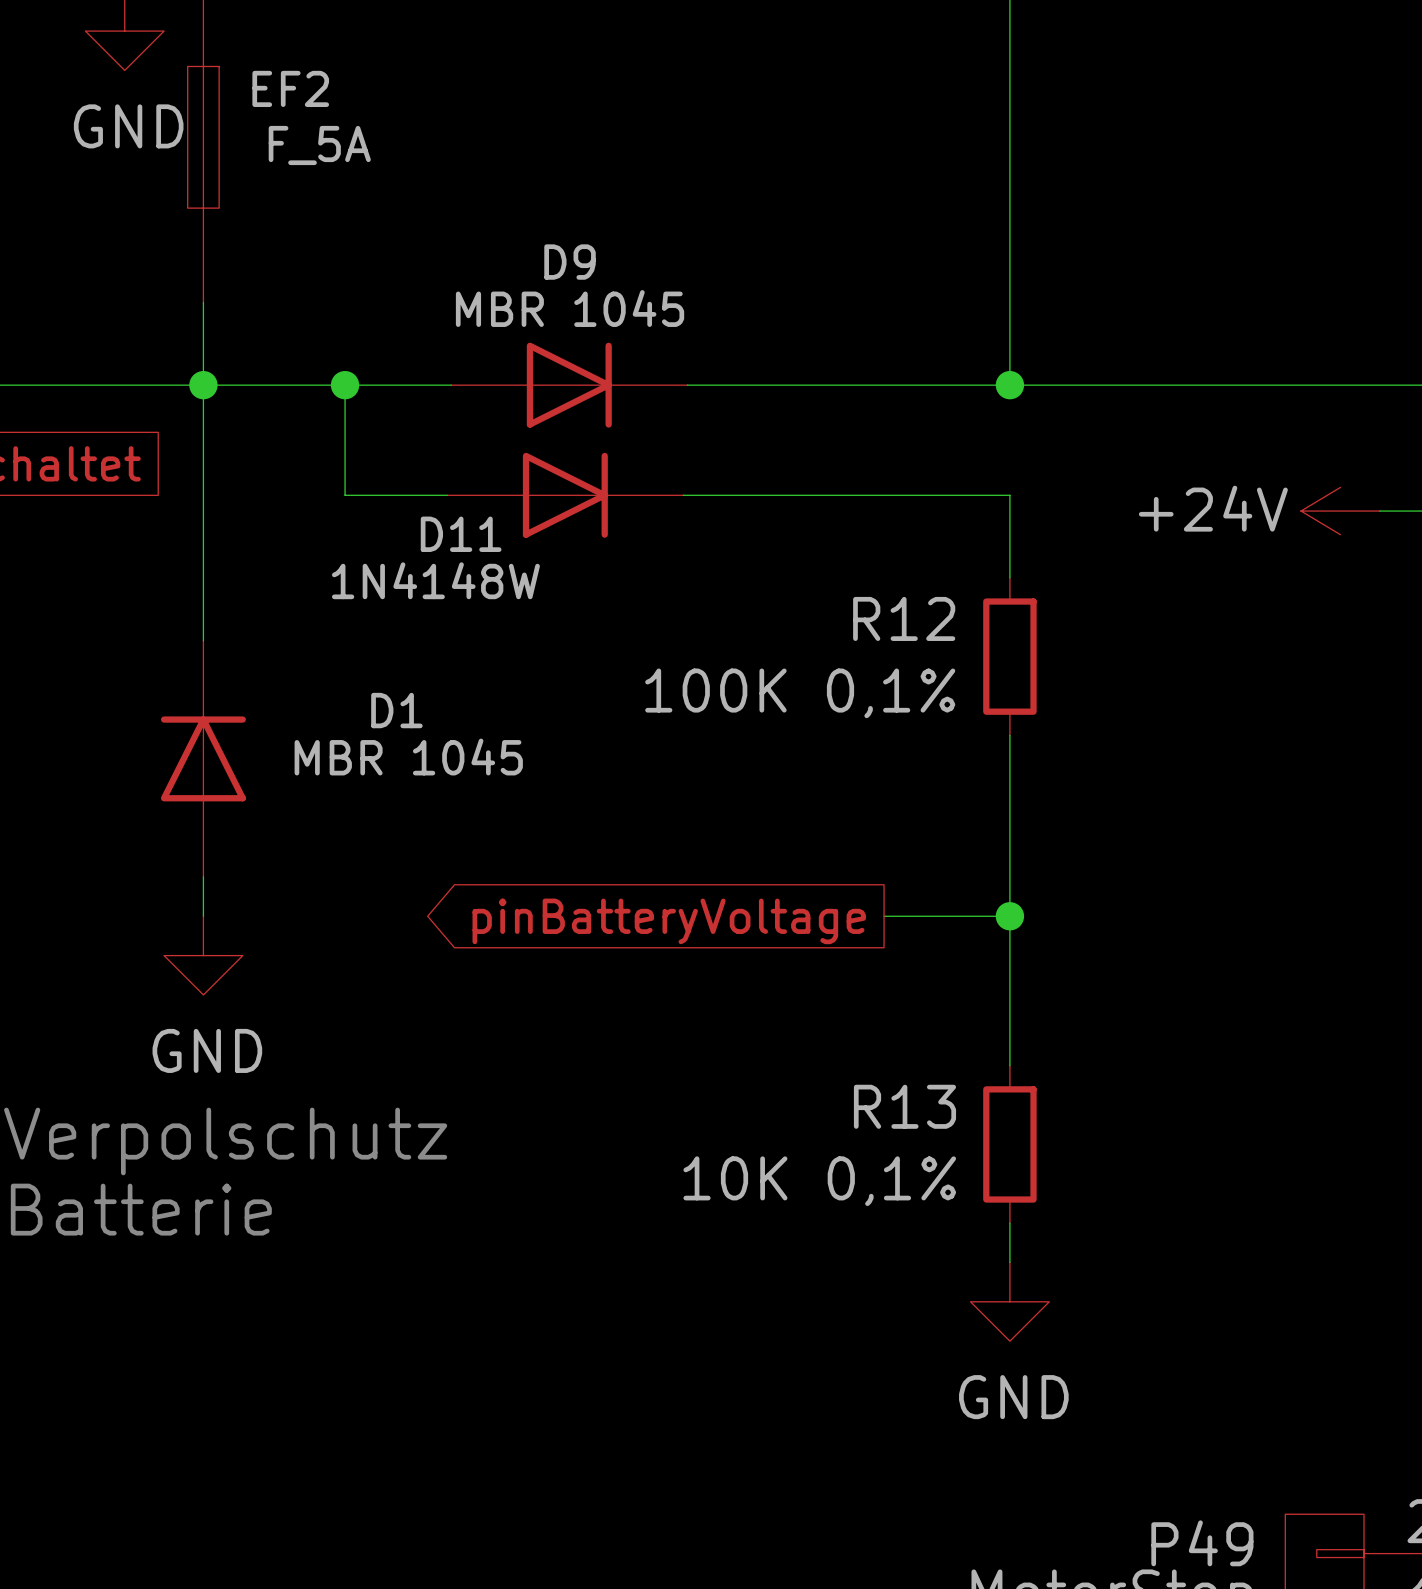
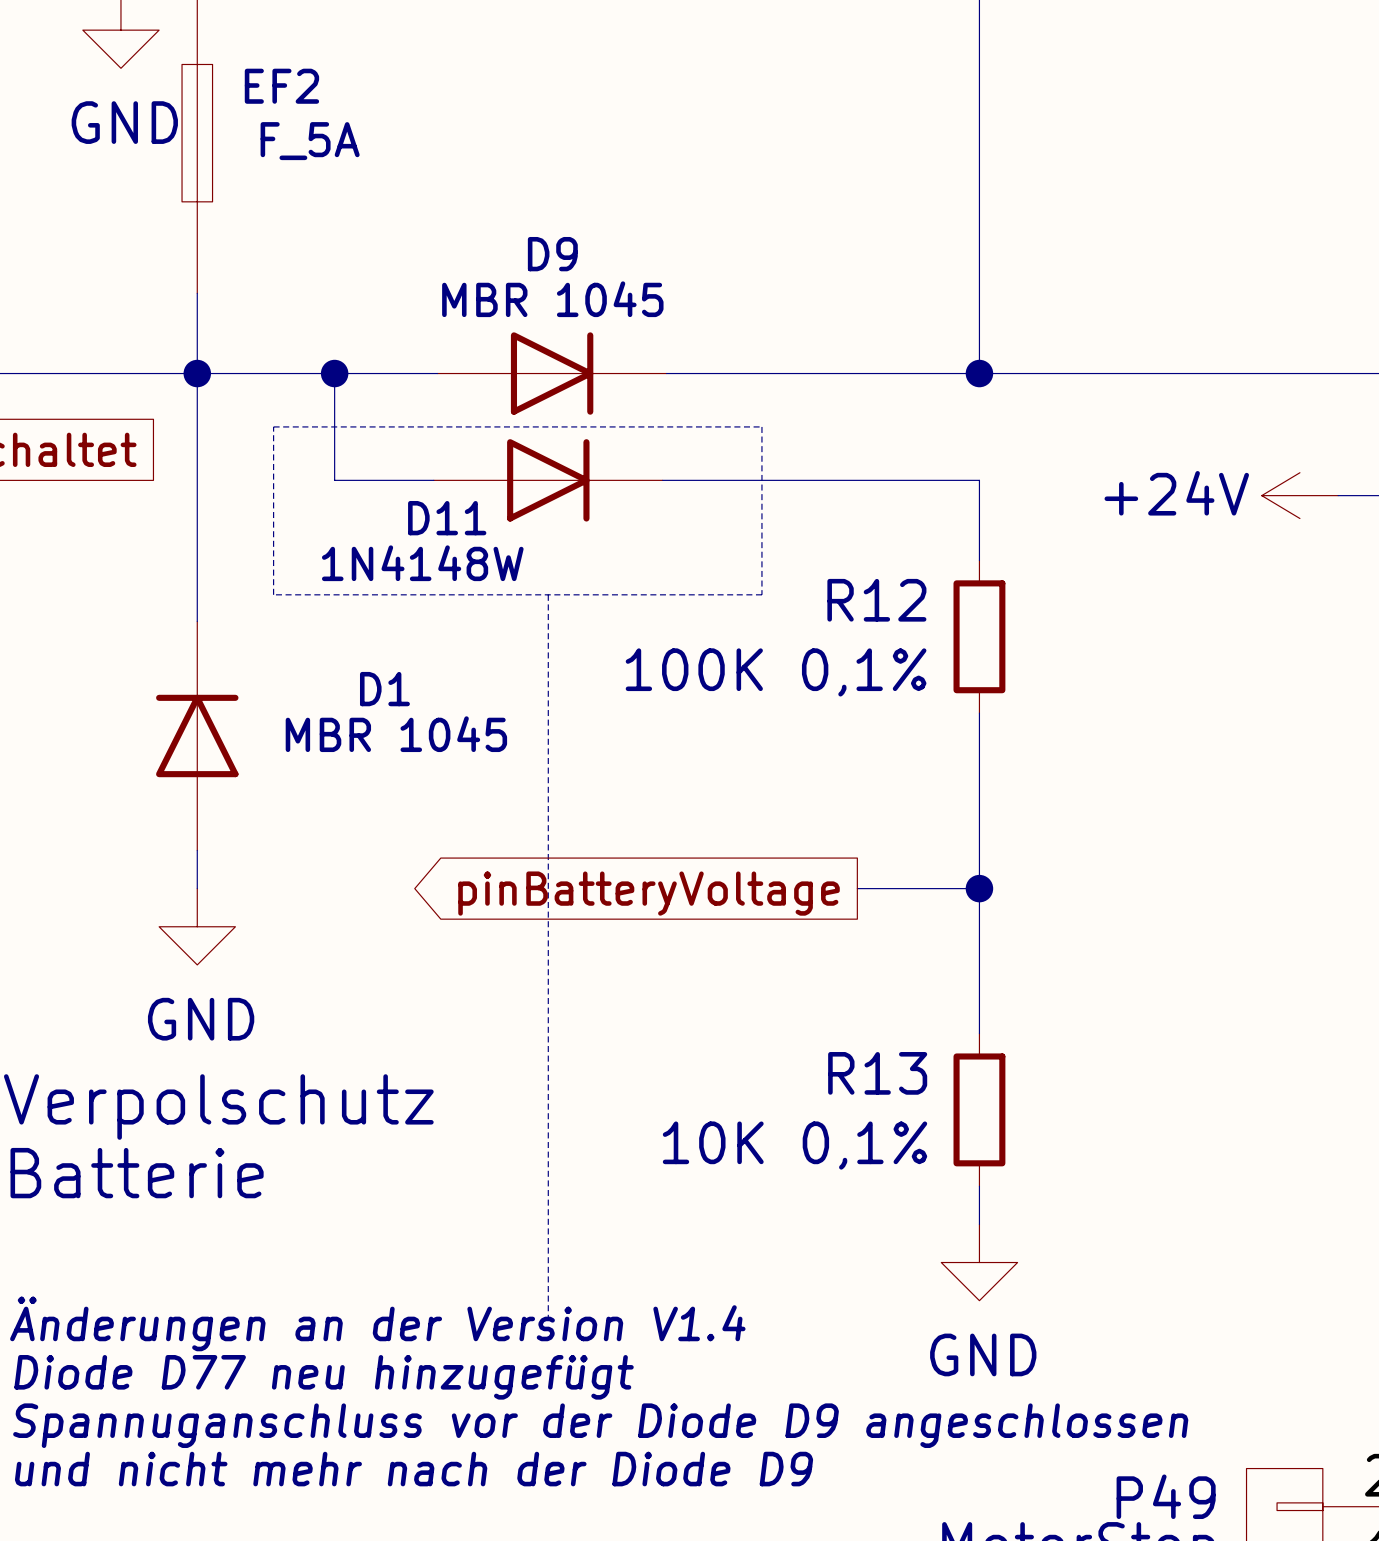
line: none -> (273, 426) (761, 426) (761, 594) (273, 594) (273, 426)
line: none -> (548, 594) (548, 1319)
text: none -> Änderungen an der Version V1.4 (377, 1323)
text: none -> Diode D77 neu hinzugefügt (324, 1377)
text: none -> Spannuganschluss vor der Diode D9 angeschlossen (600, 1425)
text: none -> und nicht mehr nach der Diode D9 (414, 1469)

